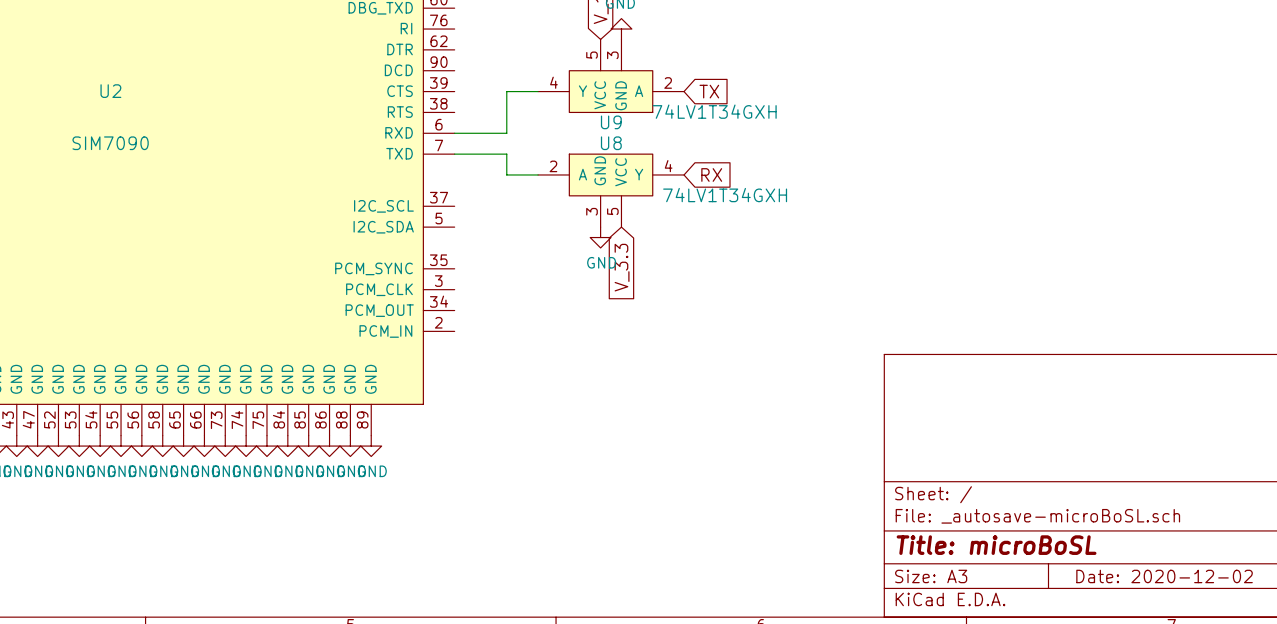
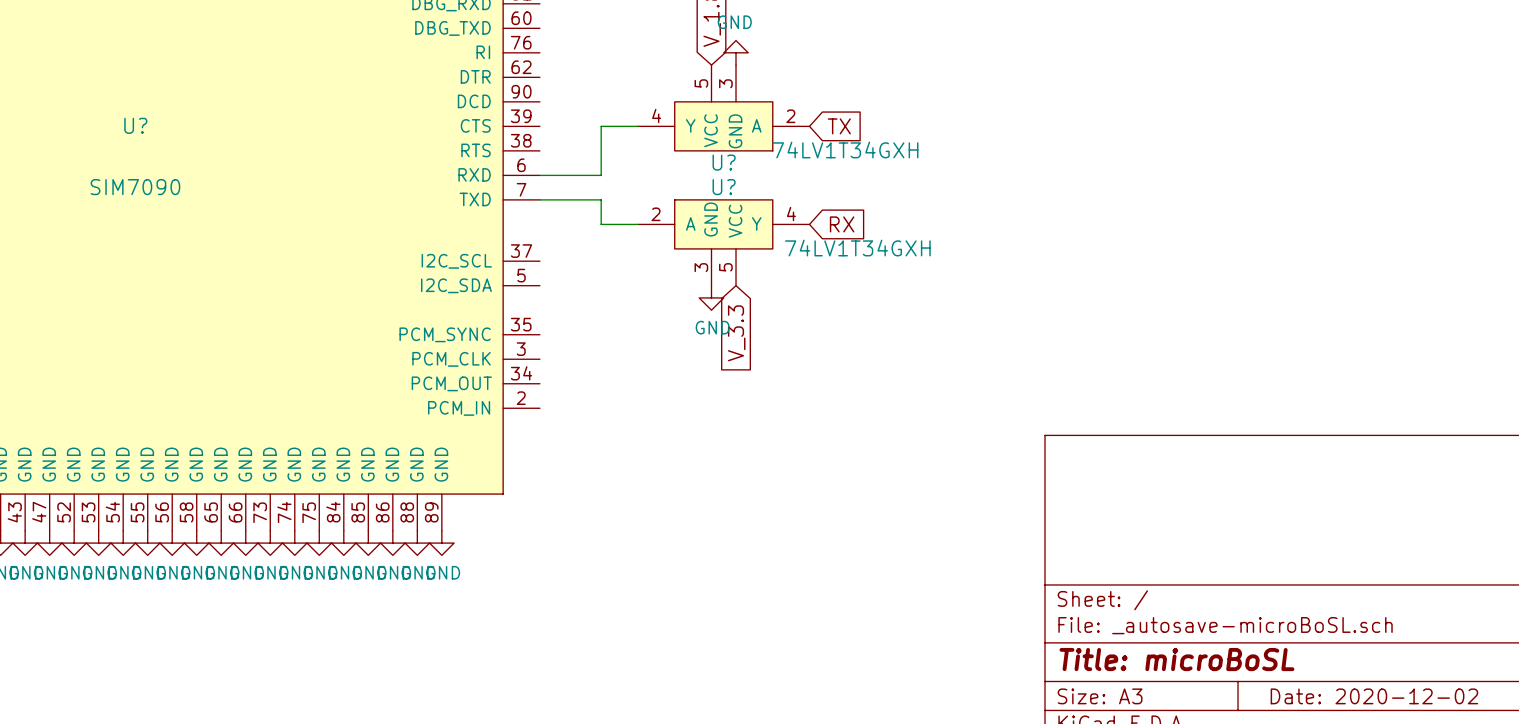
U2 name: U2 (110, 91) -> U? (135, 125)
U9 name: U9 (611, 122) -> U? (724, 162)
U8 name: U8 (611, 143) -> U? (724, 187)

